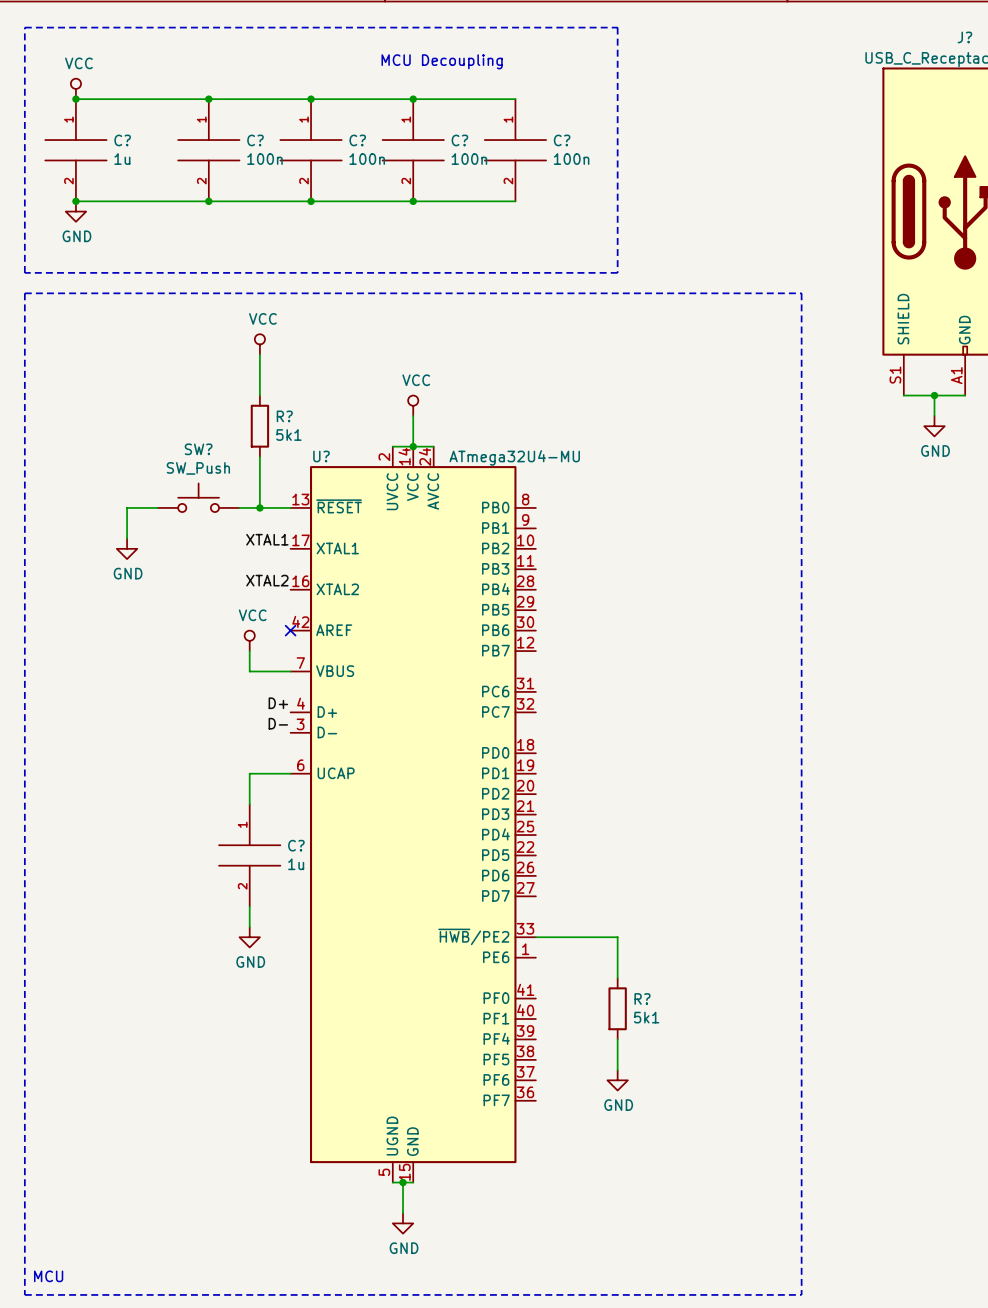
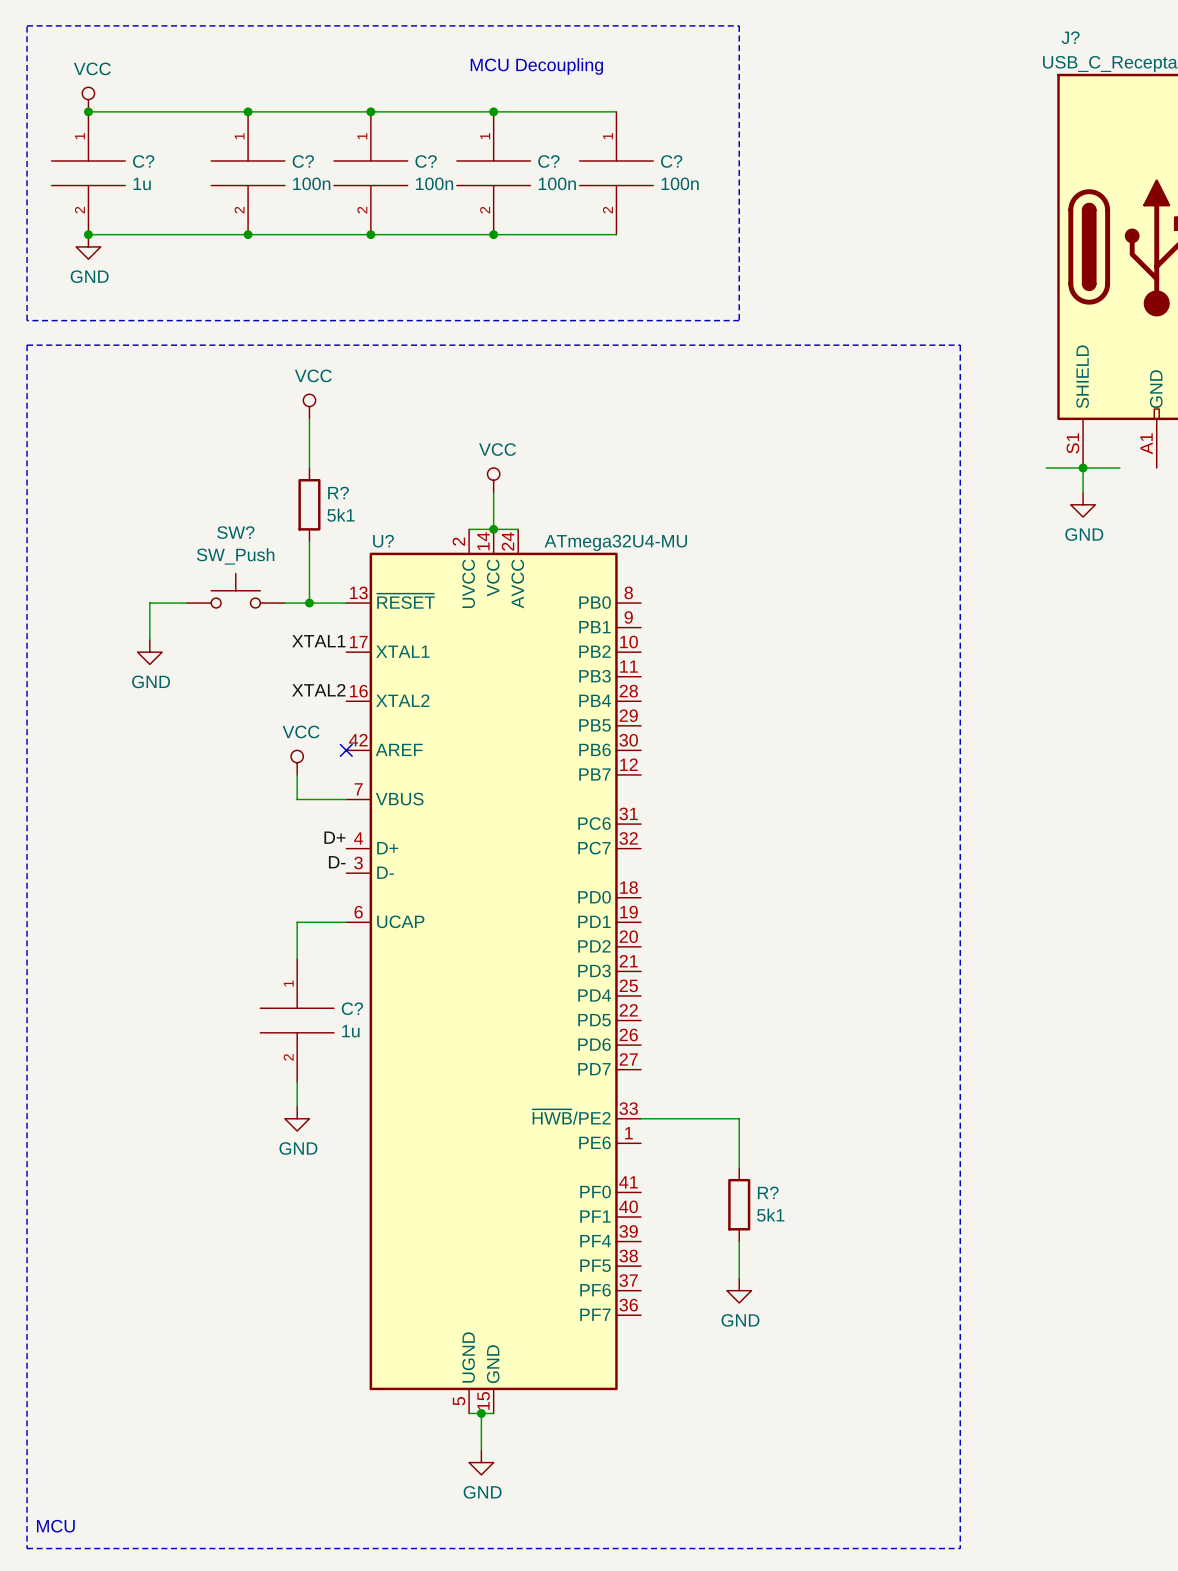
J? name position: J? (964, 37) -> J? (1070, 37)
wire: none -> (1046, 467) (1083, 467) (1083, 492)
junction position: (934, 395) -> (1083, 467)
wire: (965, 395) (934, 395) (934, 415) -> none
power symbol position: GND (934, 426) -> GND (1083, 504)

